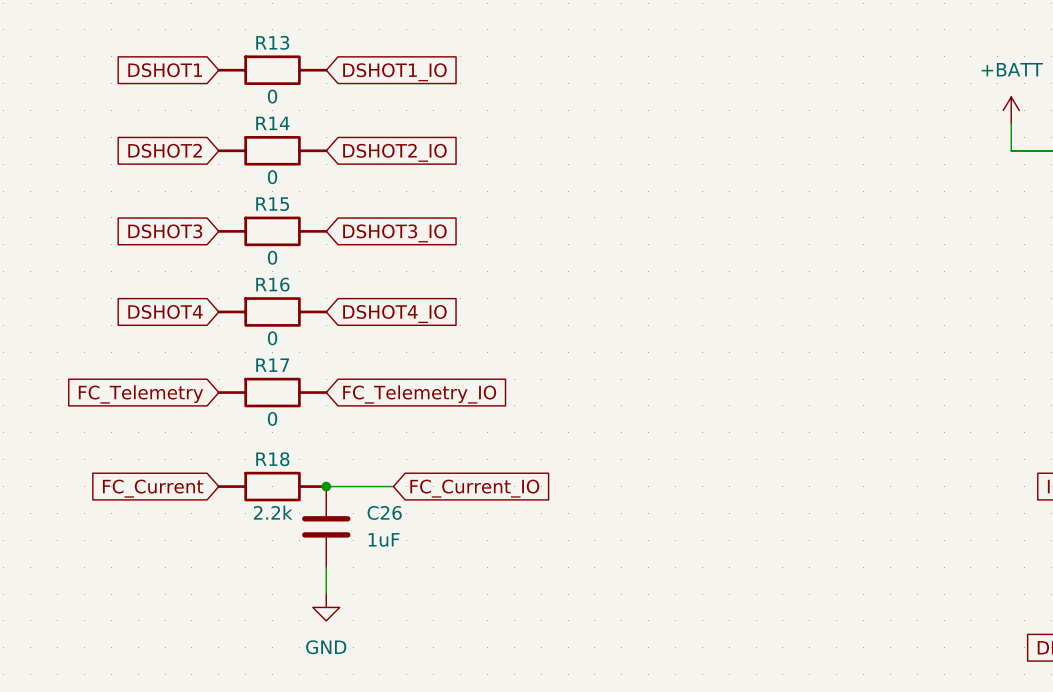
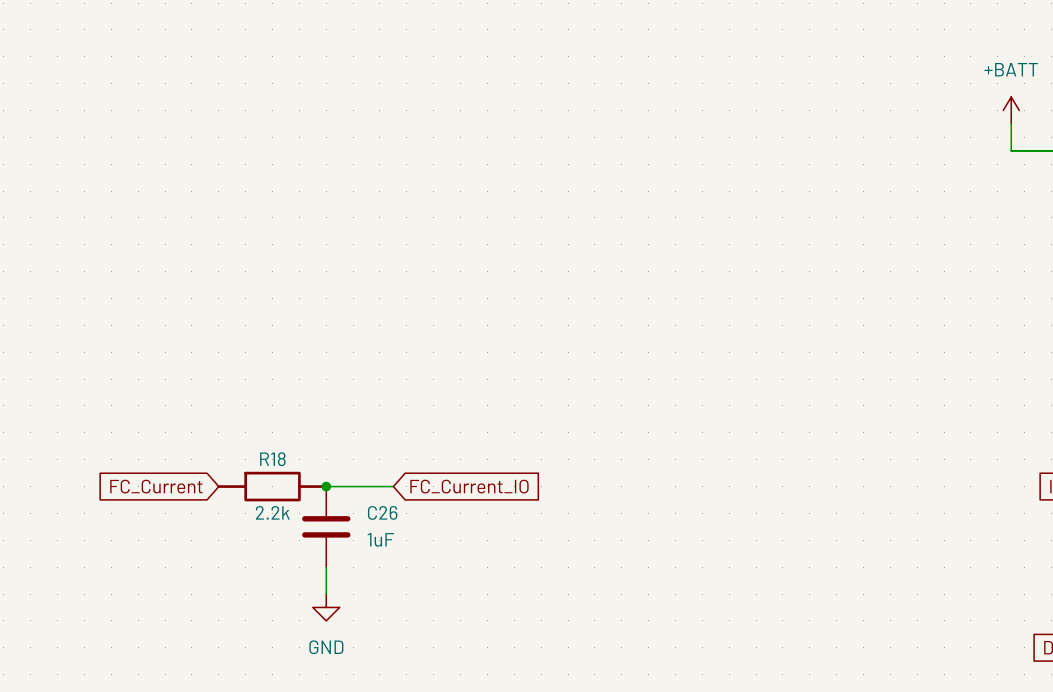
global label: DSHOT1 (165, 70) -> none
R13: 0 (272, 70) -> none
global label: DSHOT1_IO (394, 72) -> none
global label: DSHOT2 (165, 150) -> none
R14: 0 (272, 150) -> none
global label: DSHOT2_IO (394, 152) -> none
global label: DSHOT3 (165, 231) -> none
R15: 0 (272, 231) -> none
global label: DSHOT3_IO (394, 233) -> none
global label: DSHOT4 (165, 311) -> none
R16: 0 (272, 311) -> none
global label: DSHOT4_IO (394, 314) -> none
R17: 0 (272, 392) -> none
global label: FC_Telemetry (140, 394) -> none
global label: FC_Telemetry_IO (419, 394) -> none

